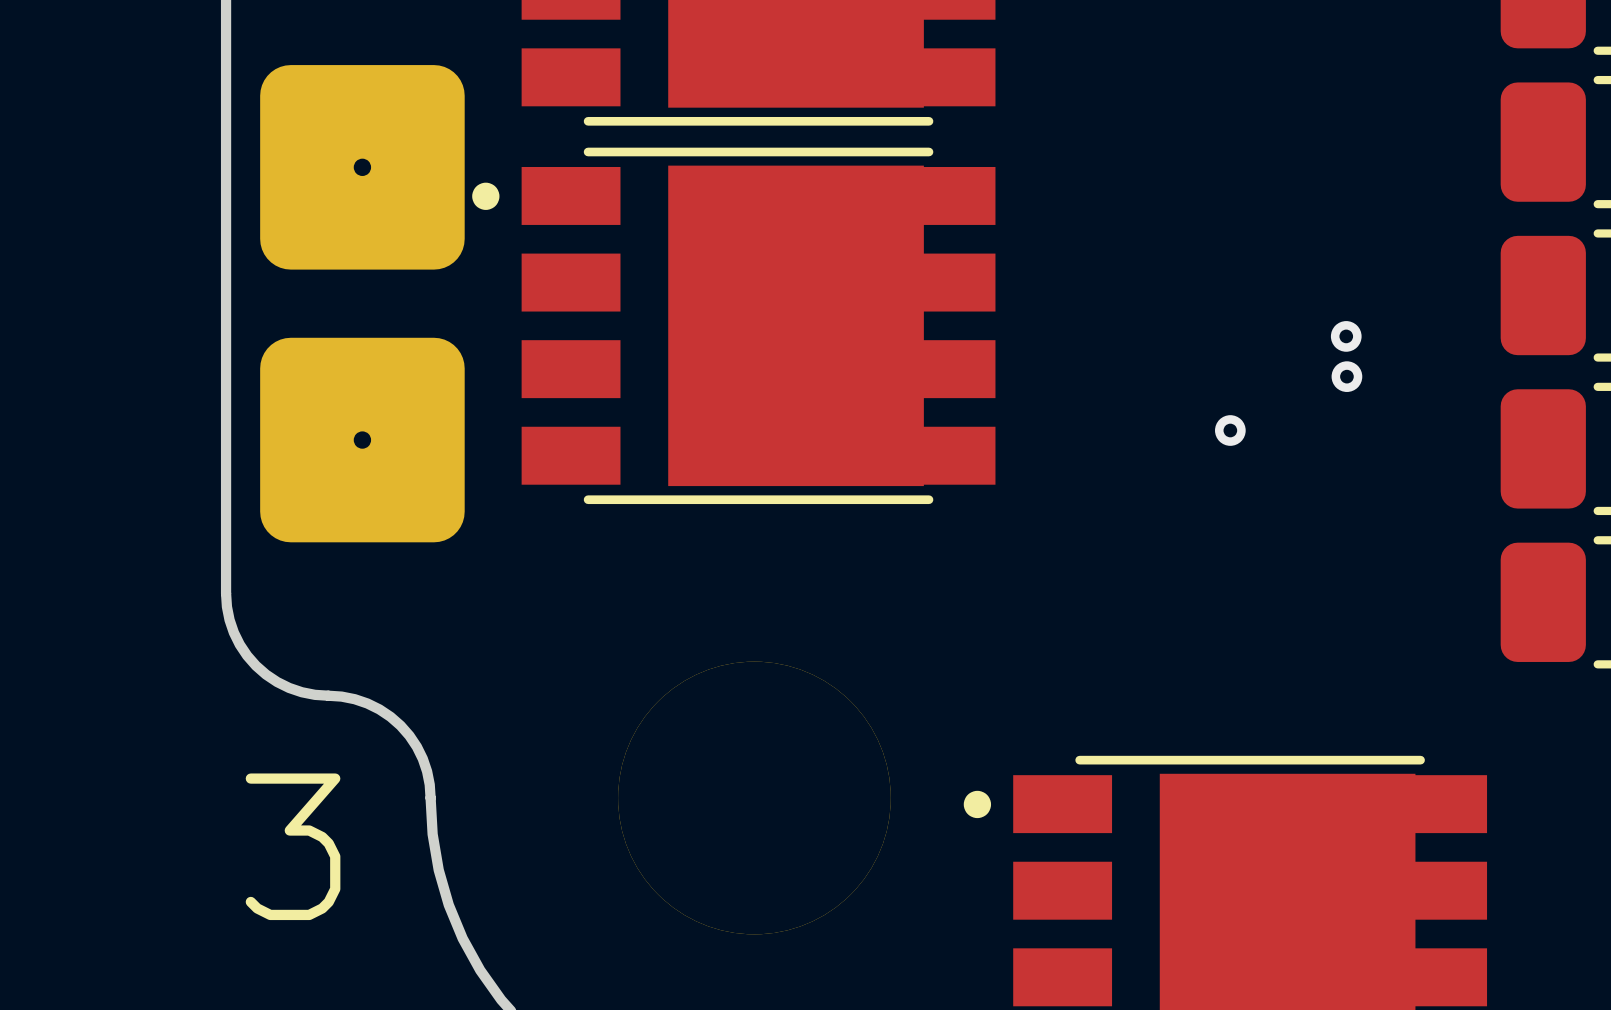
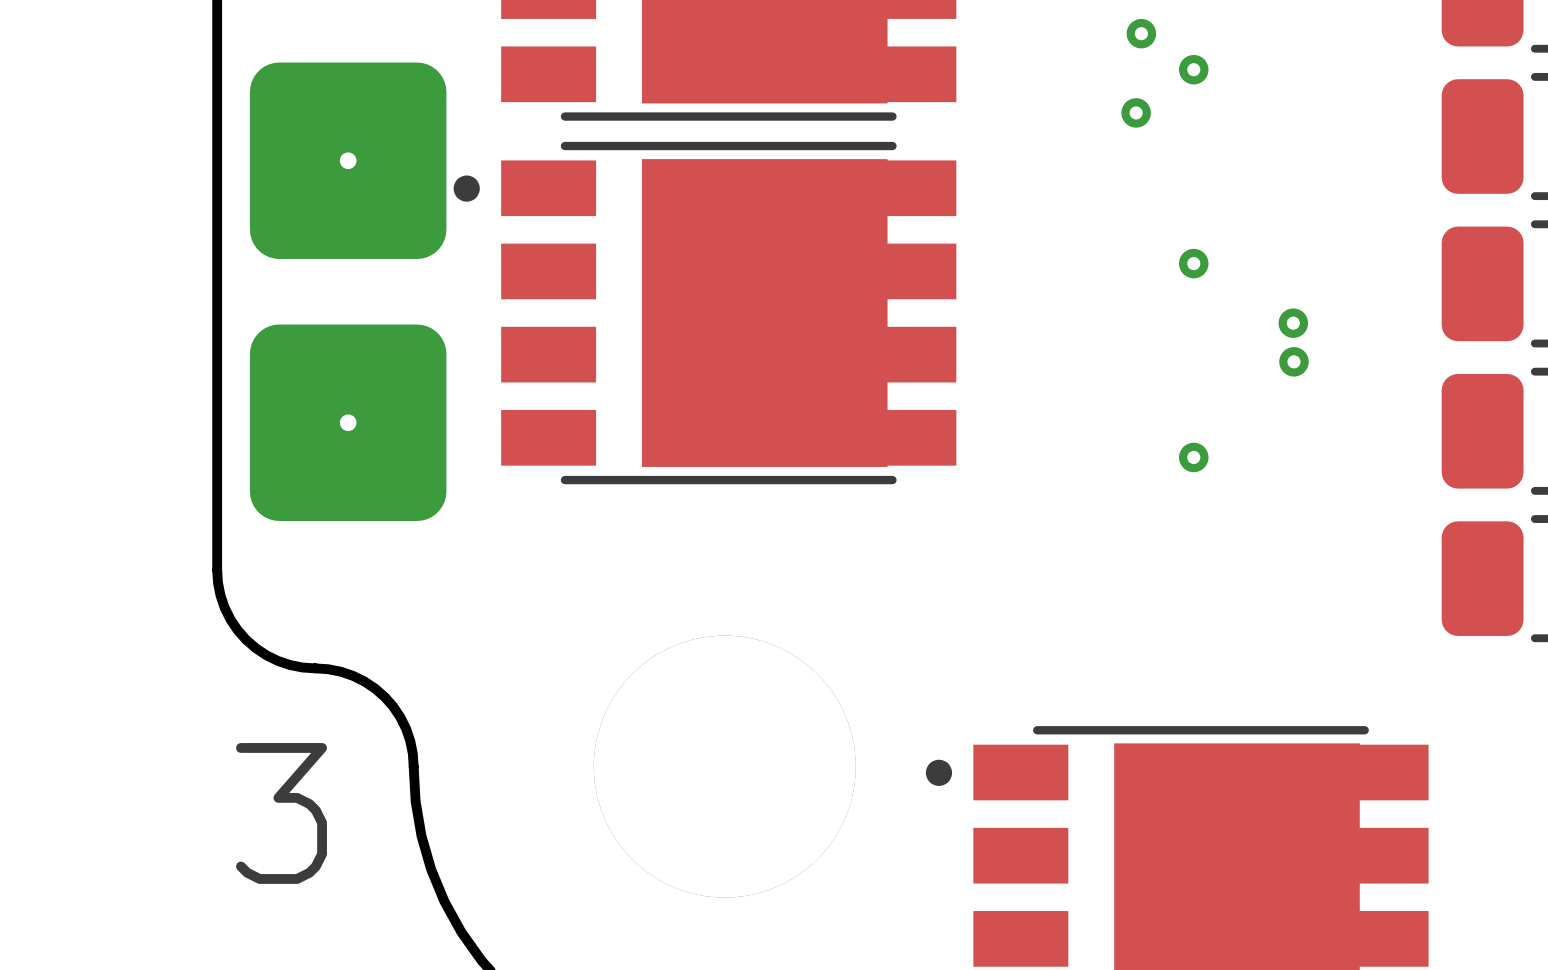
via: none -> (1141, 33)
via: none -> (1193, 69)
via: none -> (1136, 112)
via: none -> (1193, 263)
via position: (1230, 430) -> (1193, 457)

